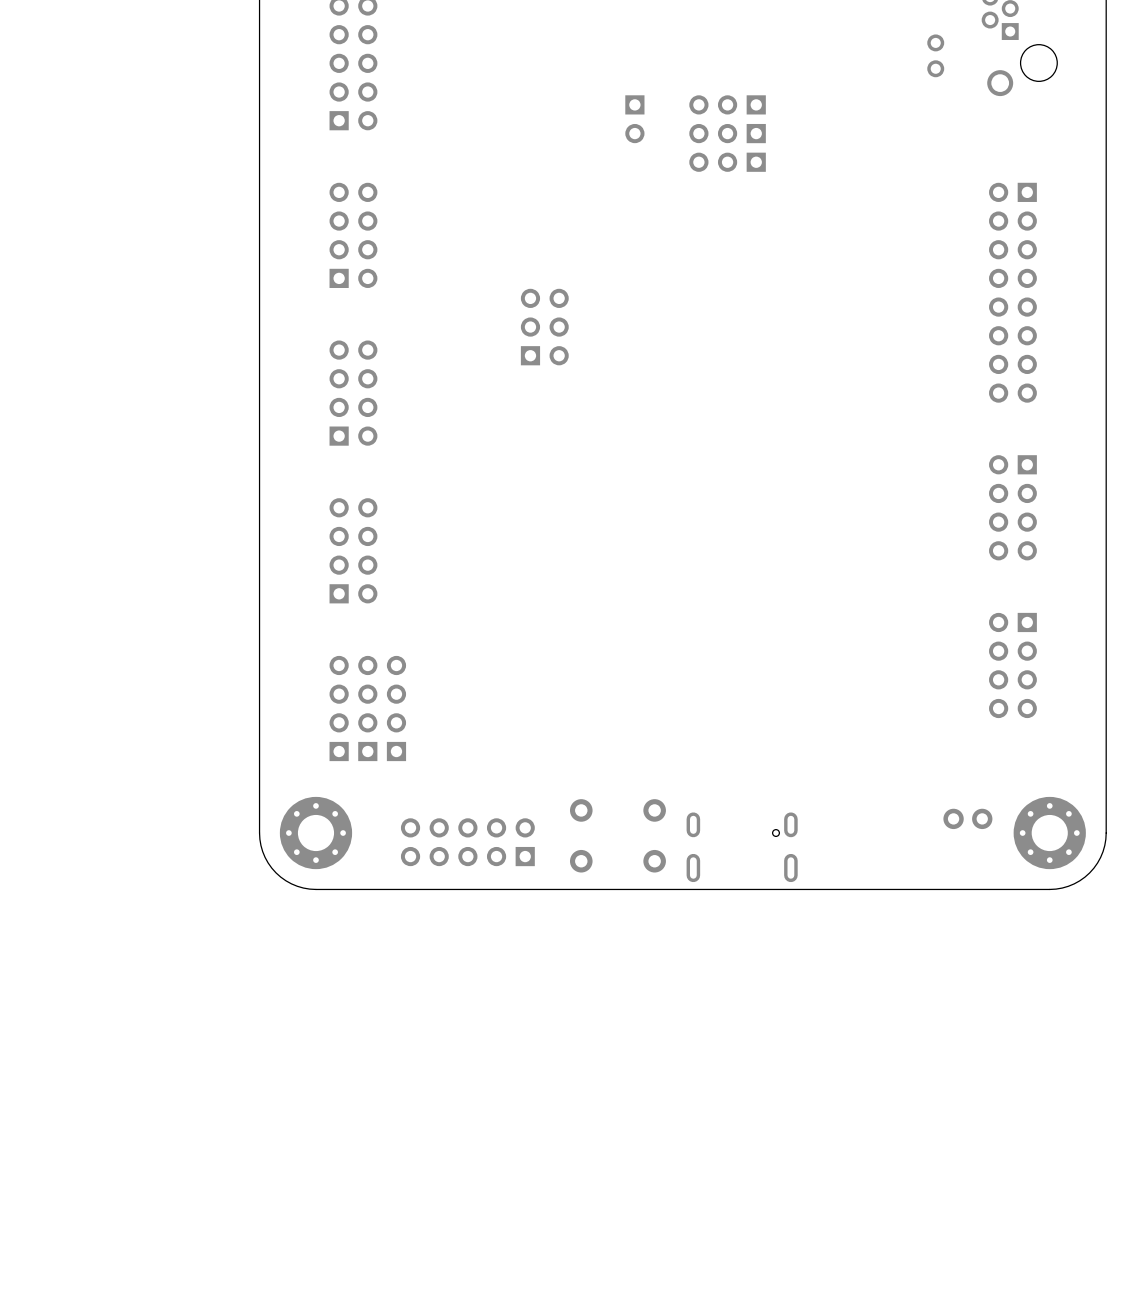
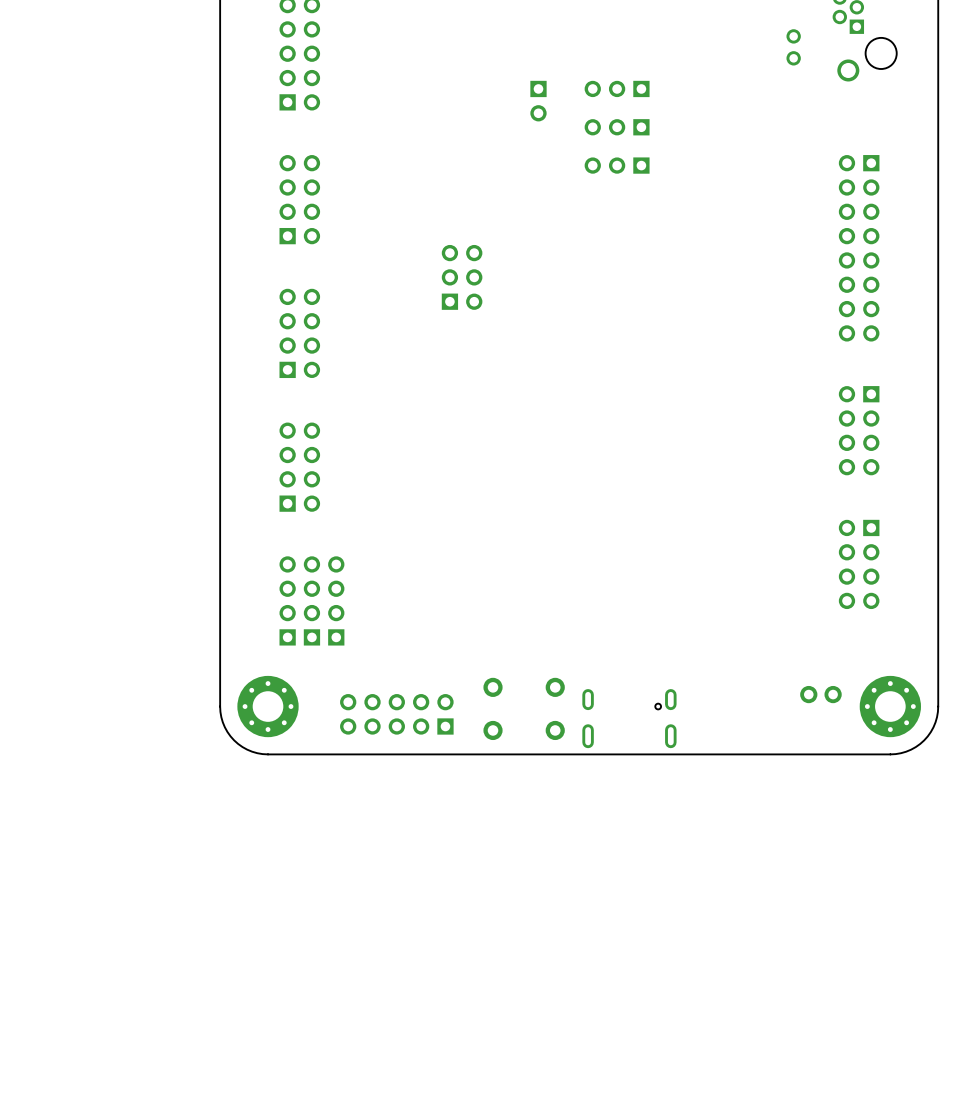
part: (727, 133) -> none
part: none -> (617, 127)
part: (727, 162) -> none
part: none -> (617, 165)

